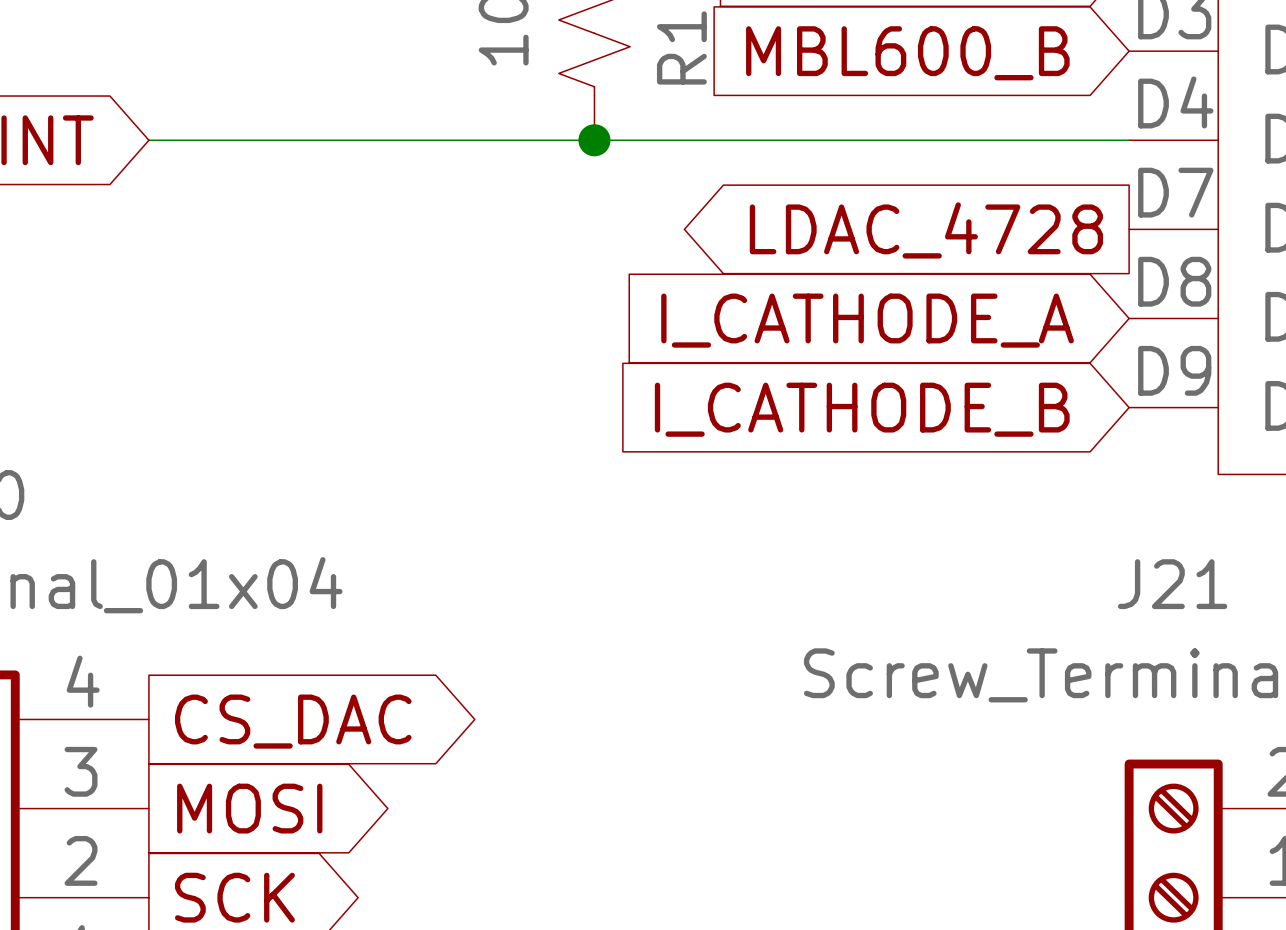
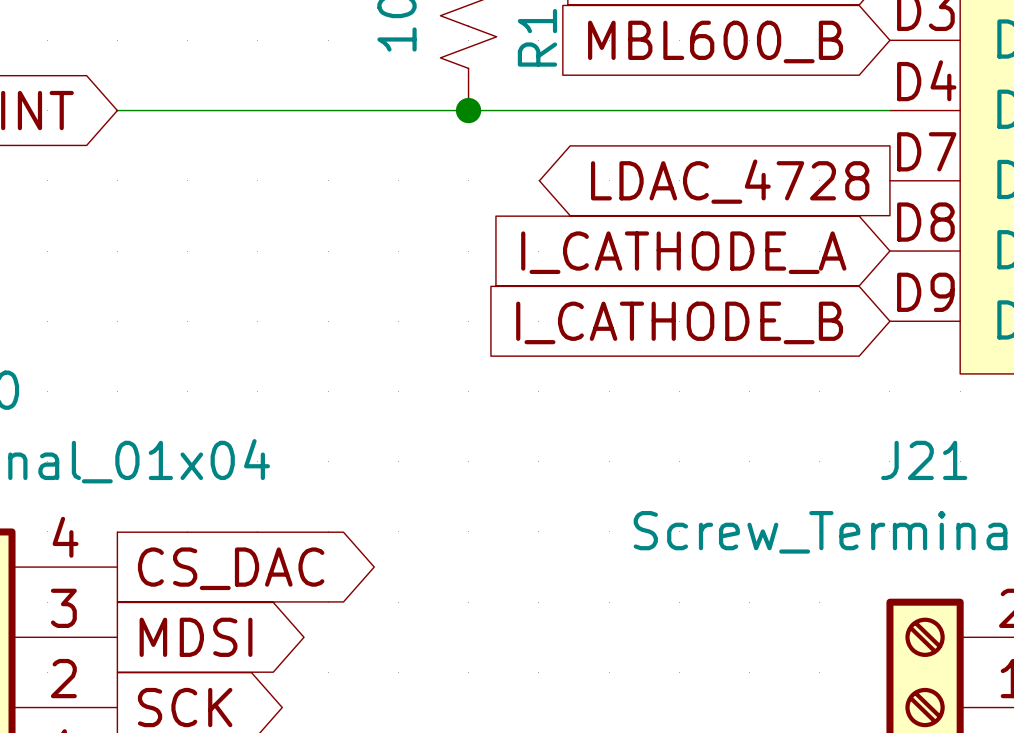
global label: MOSI (249, 808) -> MDSI (196, 637)

